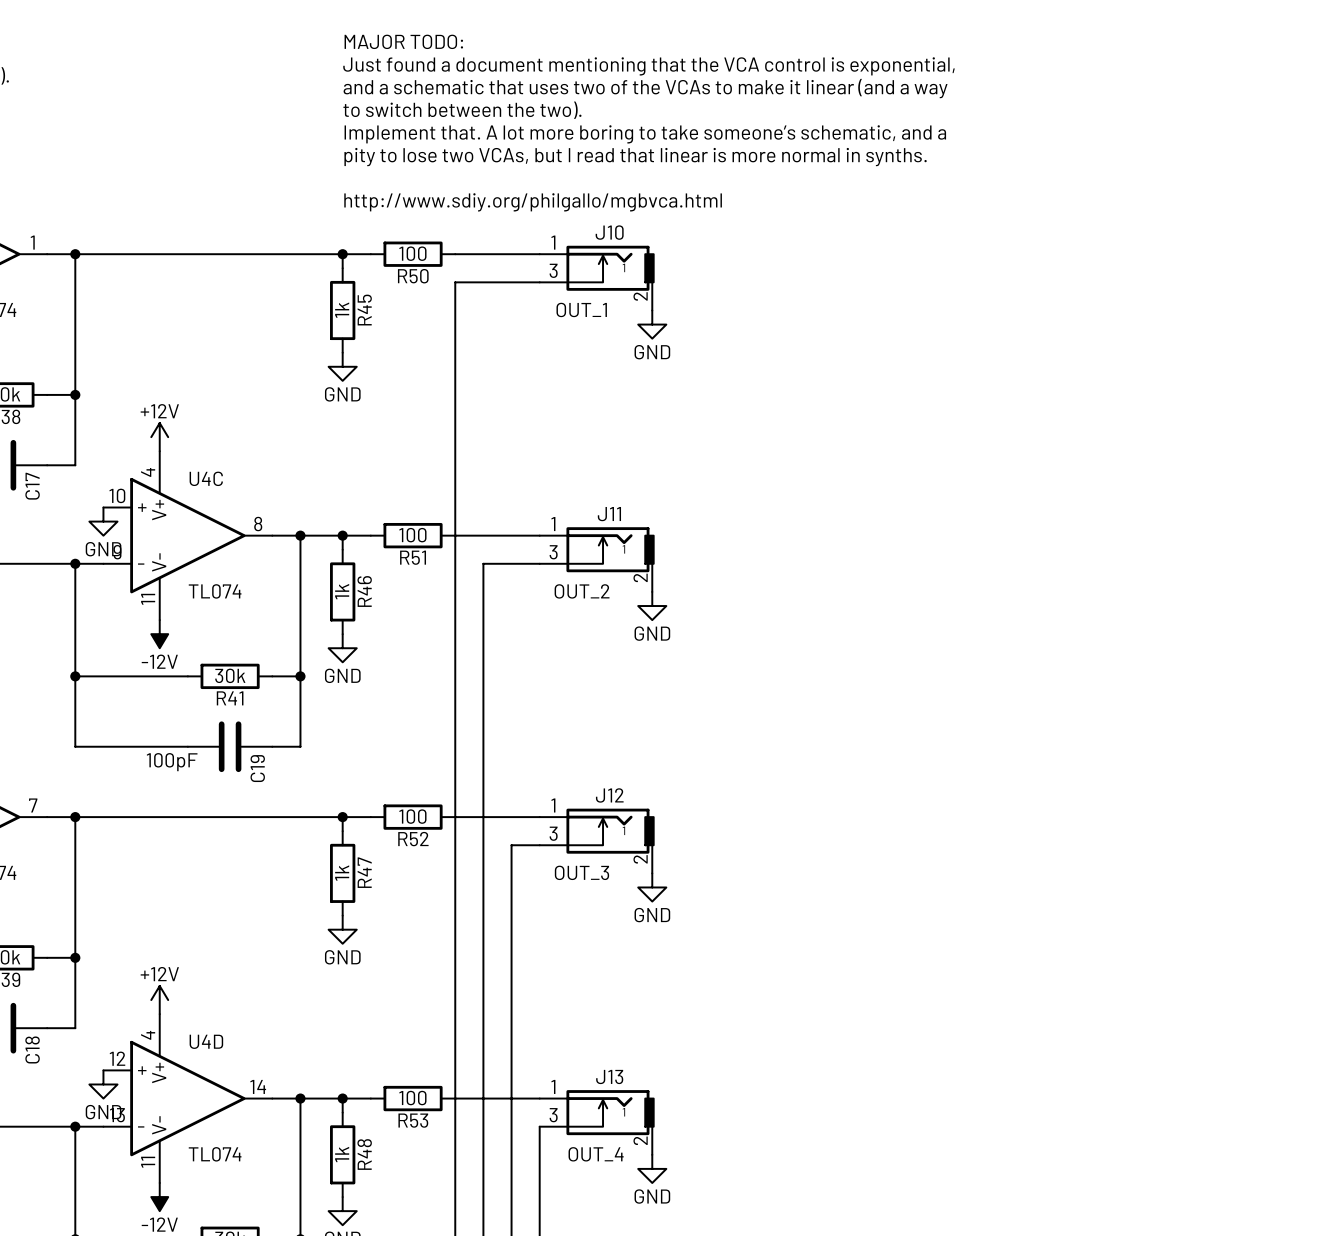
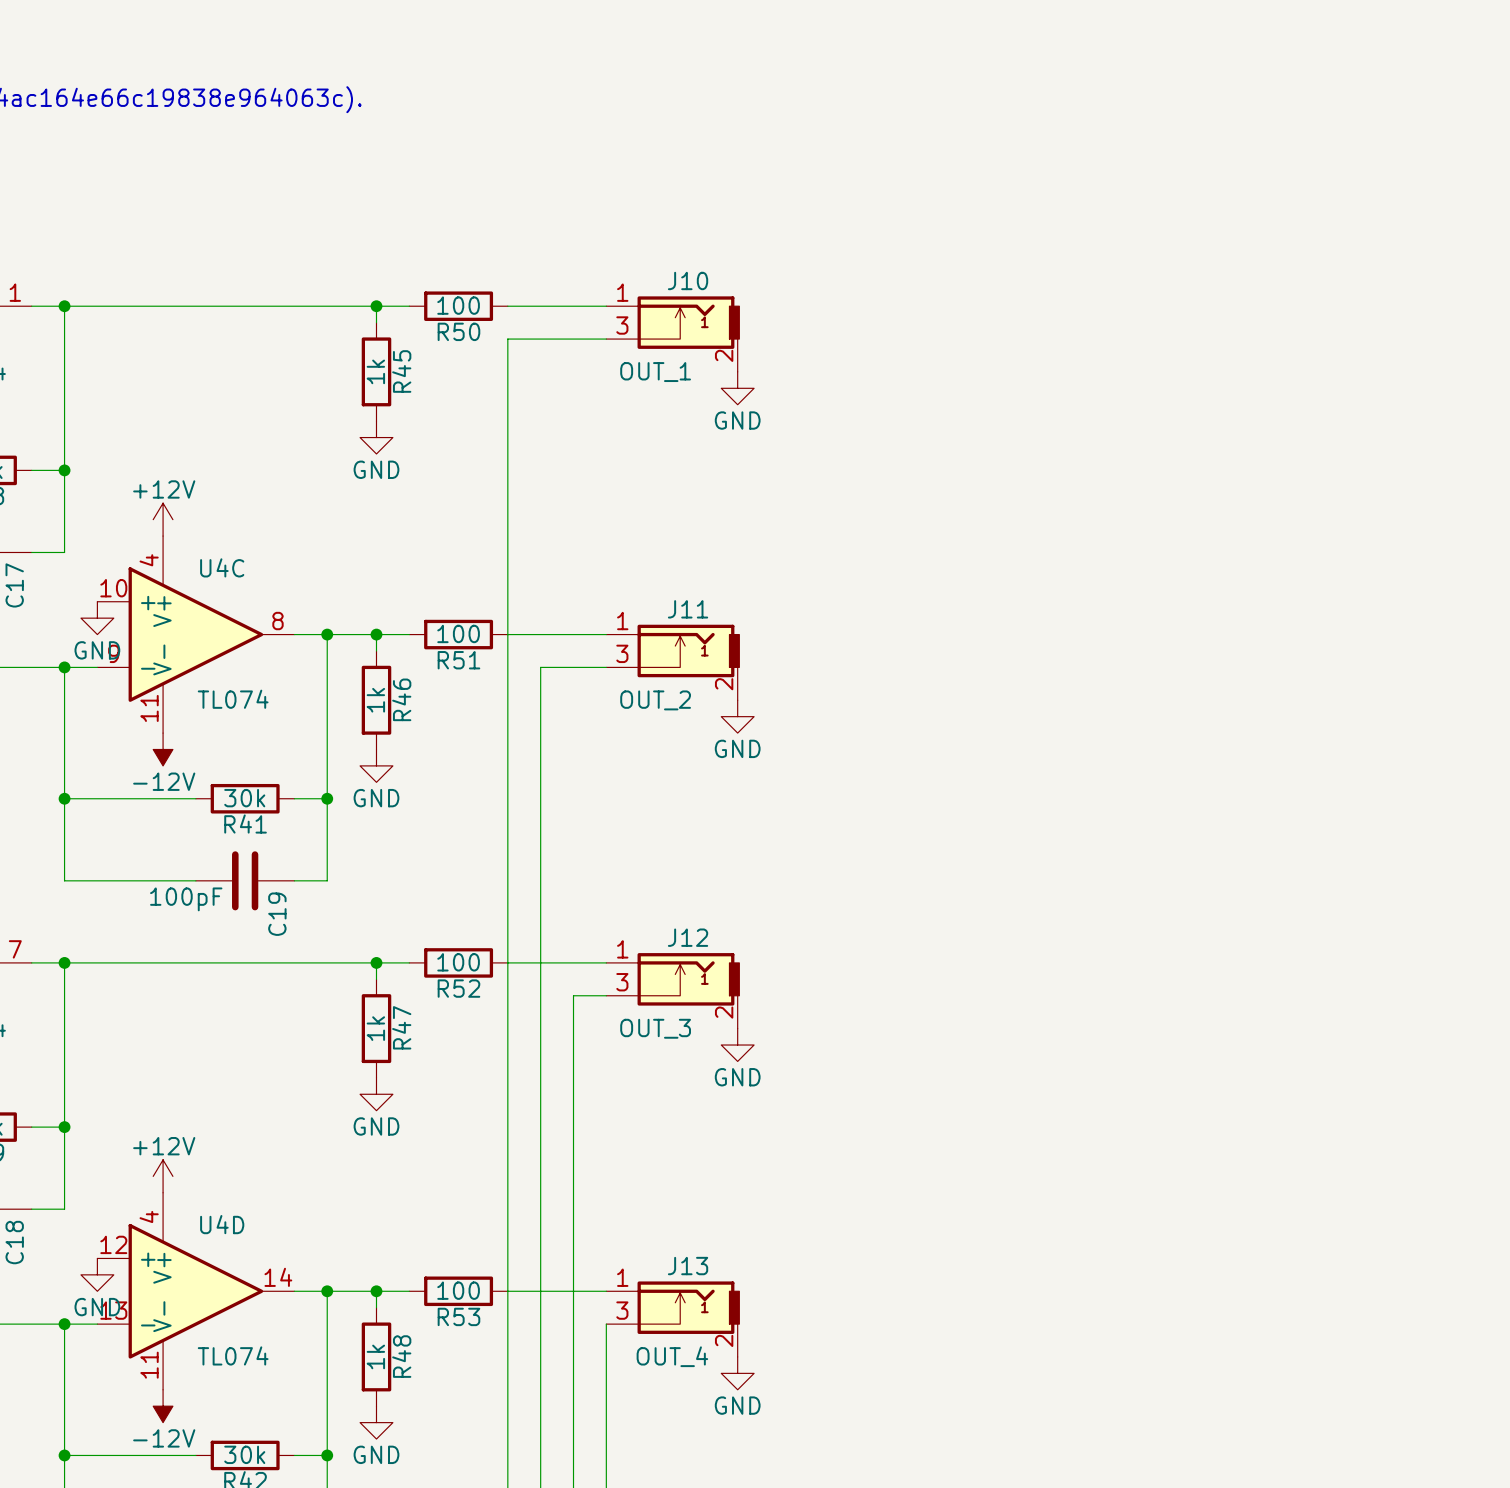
text: MAJOR TODO: (403, 41) -> none
text: Just found a document mentioning that the VCA control is exponential, (649, 66) -> none
text: and a schematic that uses two of the VCAs to make it linear (and a way (645, 88) -> none
text: to switch between the two). (462, 110) -> none
text: Implement that. A lot more boring to take someone’s schematic, and a (645, 134) -> none
text: pity to lose two VCAs, but I read that linear is more normal in synths. (635, 157) -> none
text: http://www.sdiy.org/philgallo/mgbvca.html (533, 202) -> none

